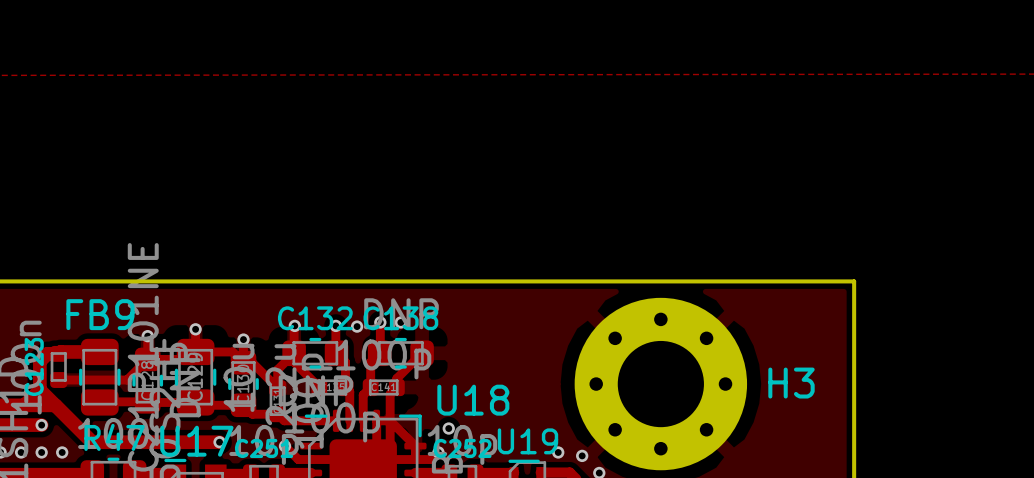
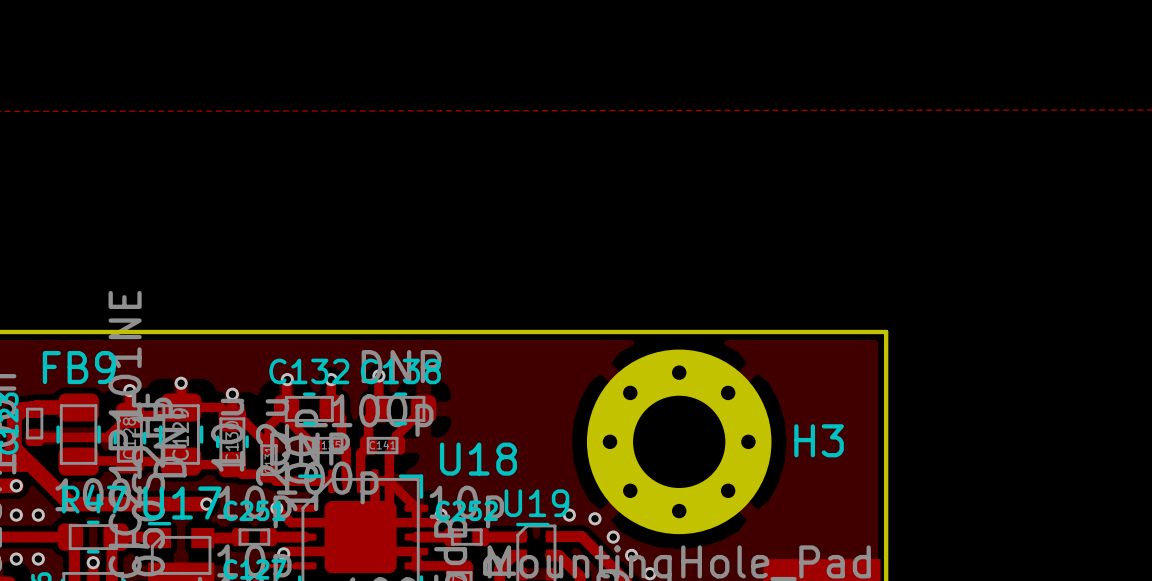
via: (400, 322) -> none
via: (357, 326) -> none
via: (448, 428) -> none

